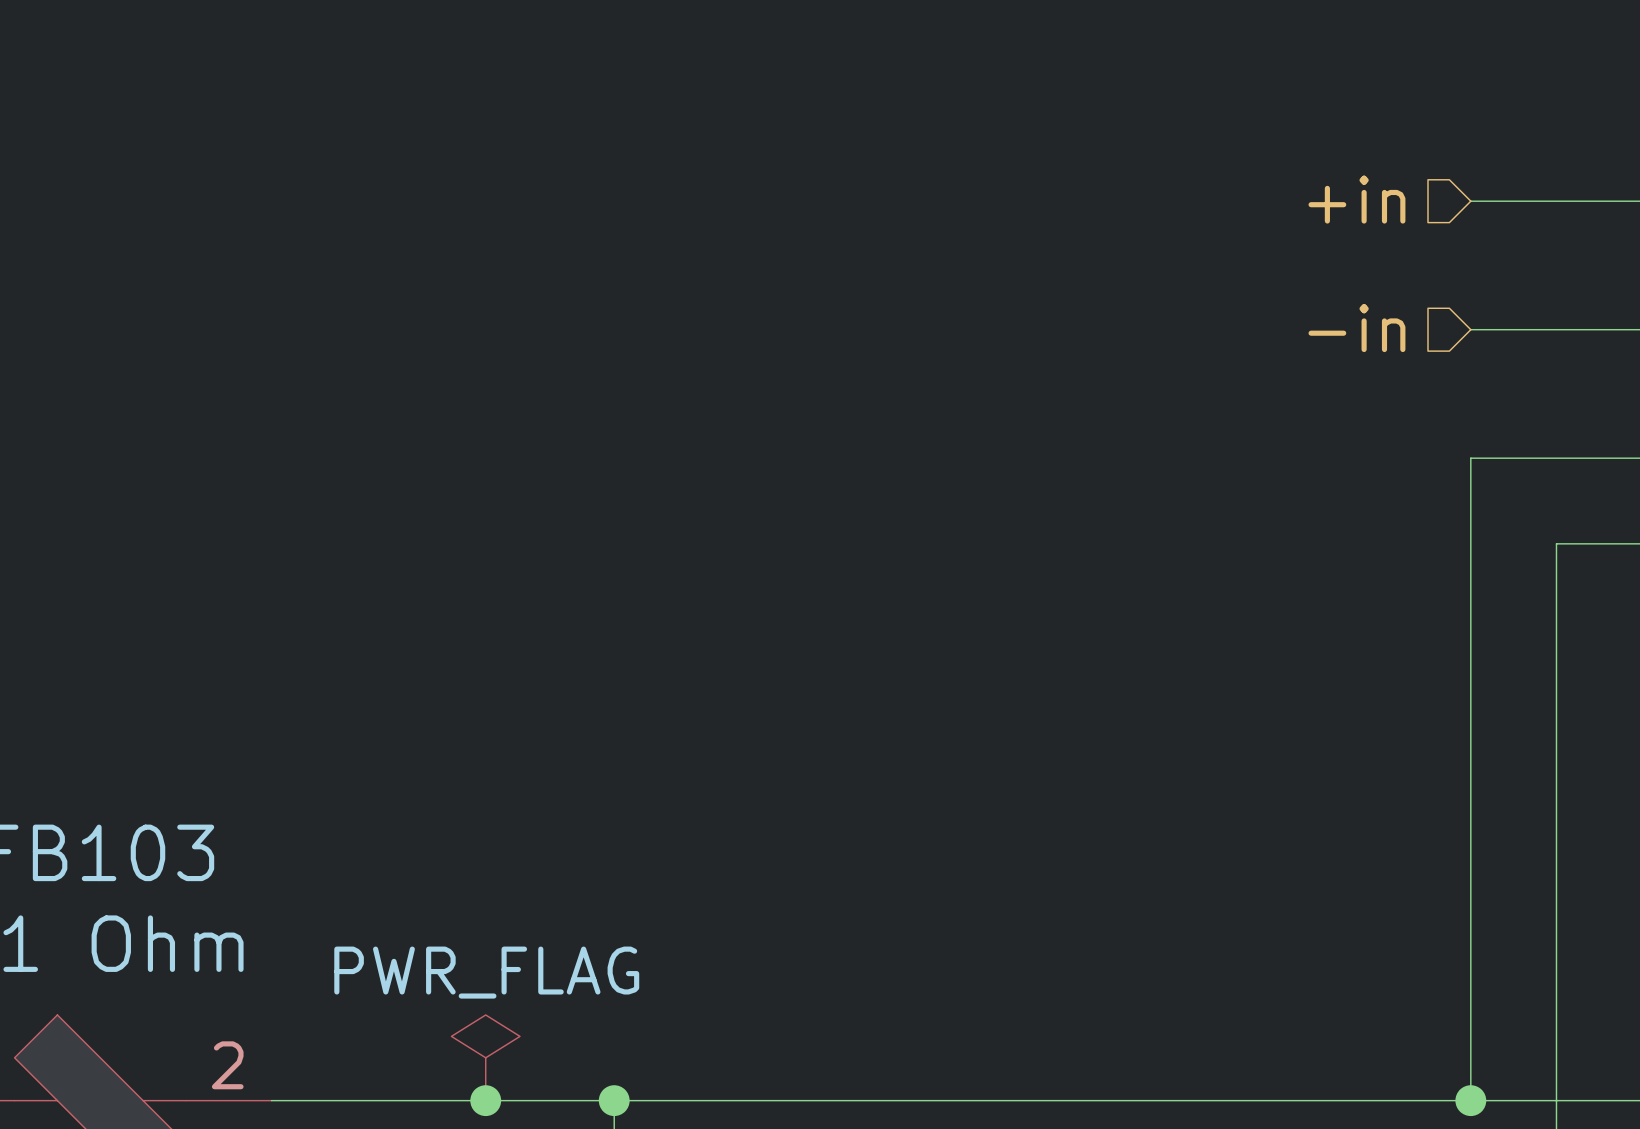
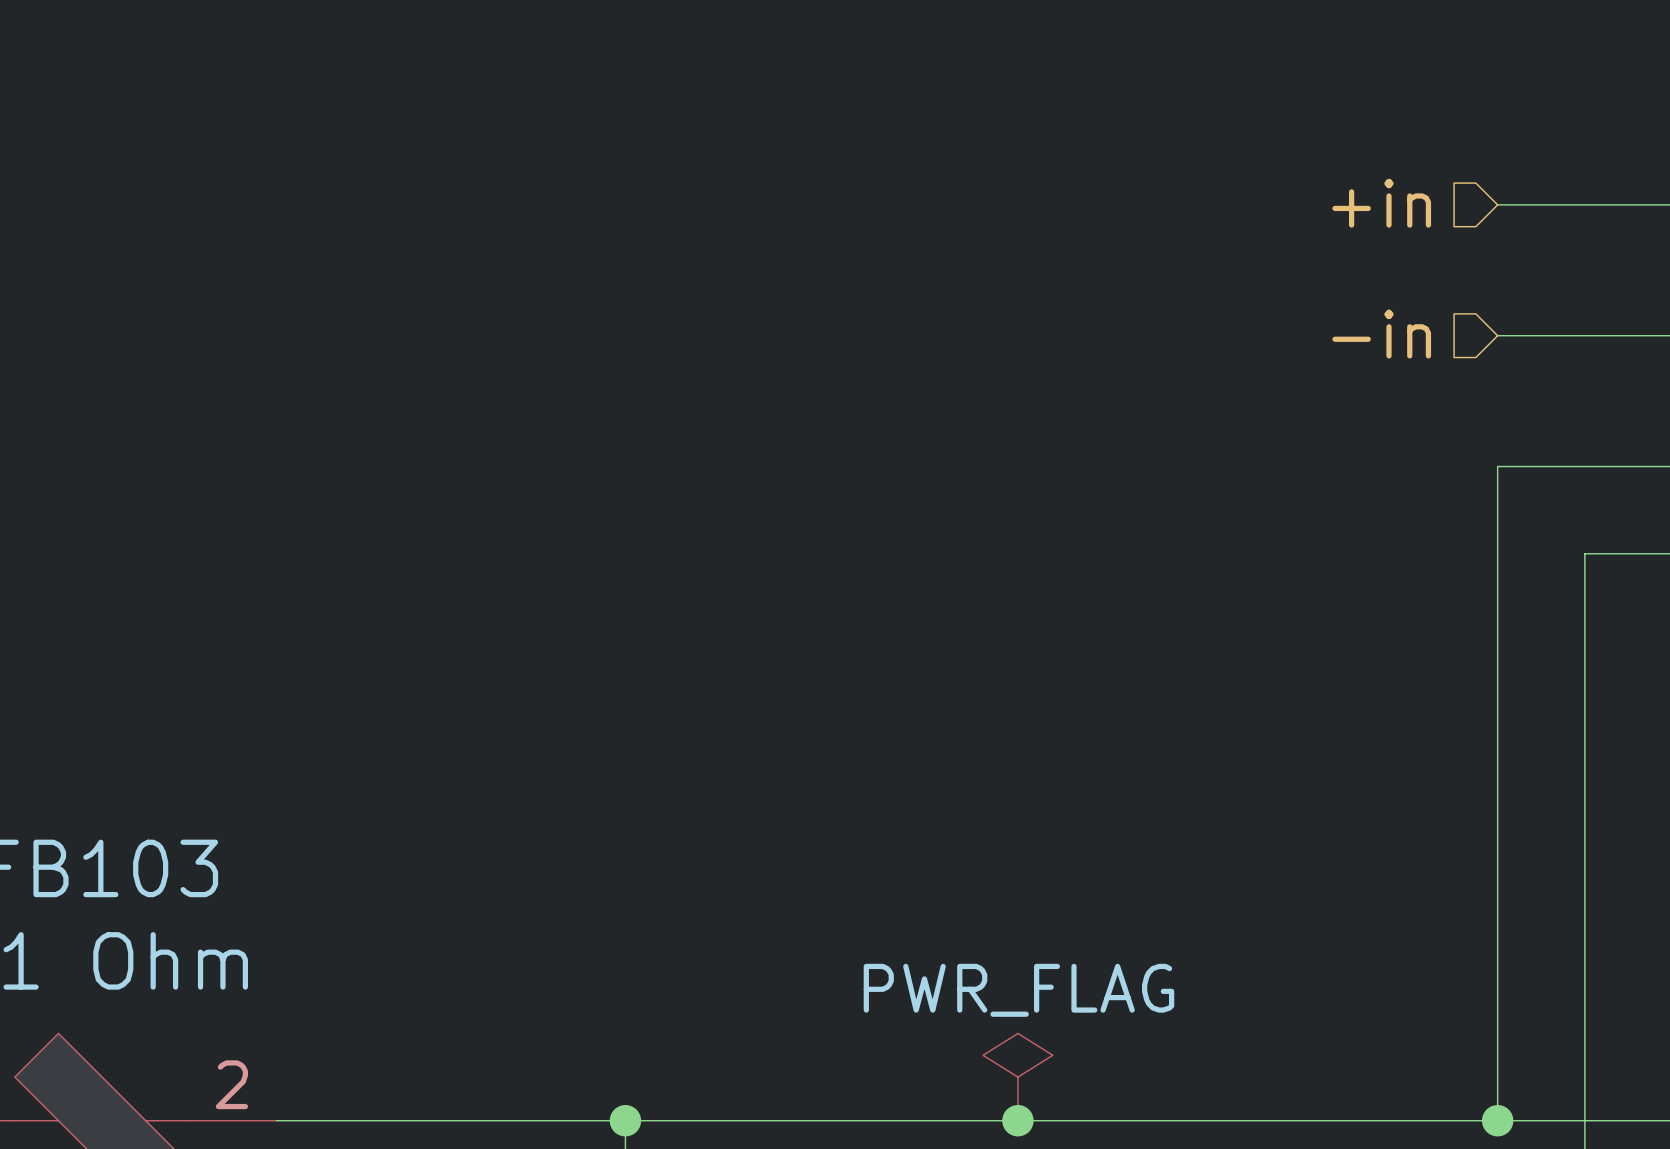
power symbol position: PWR_FLAG (485, 1057) -> PWR_FLAG (1017, 1077)
junction: (485, 1100) -> none
junction: none -> (1017, 1120)

